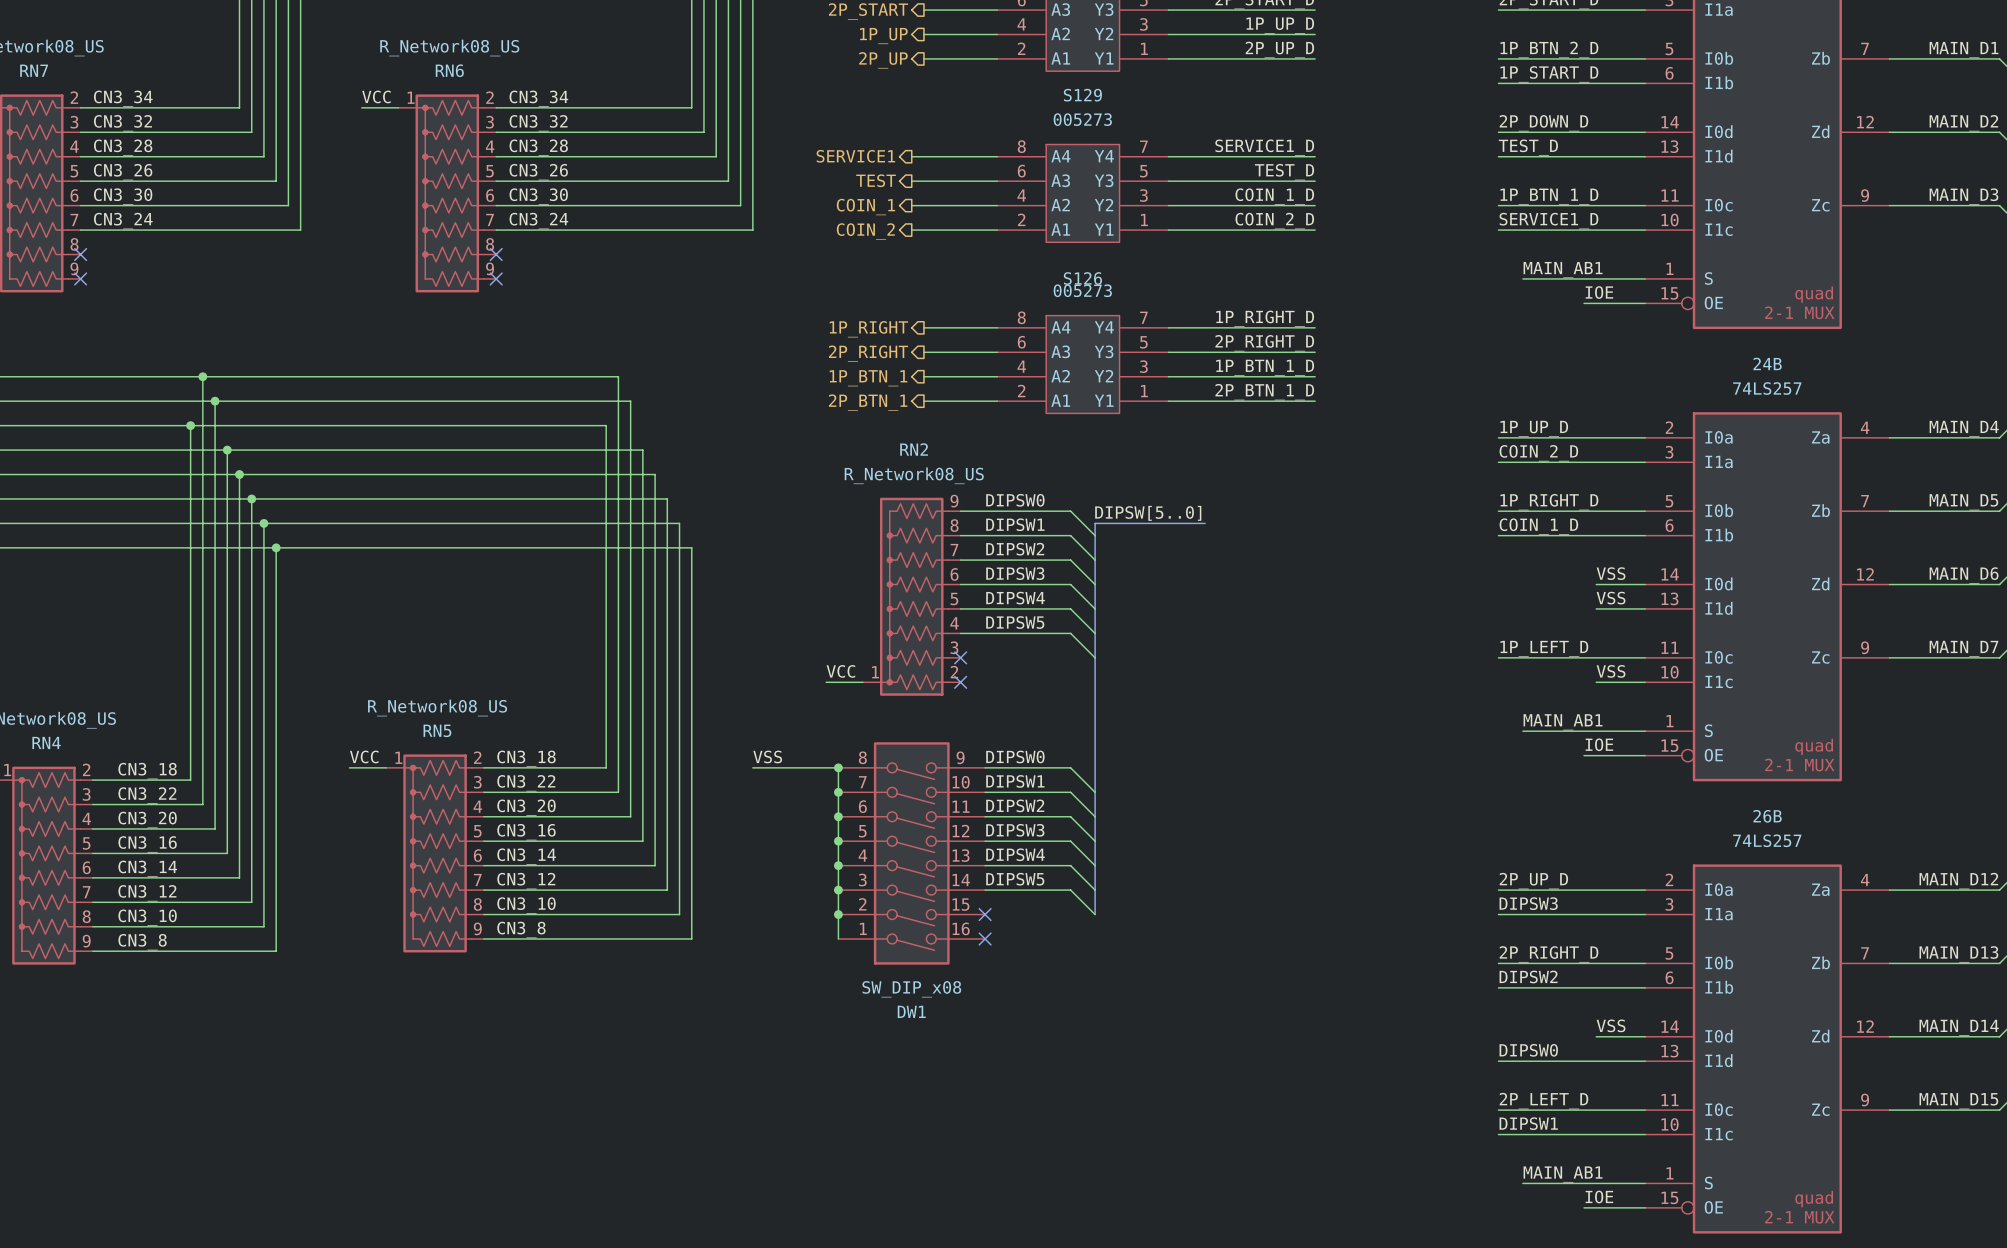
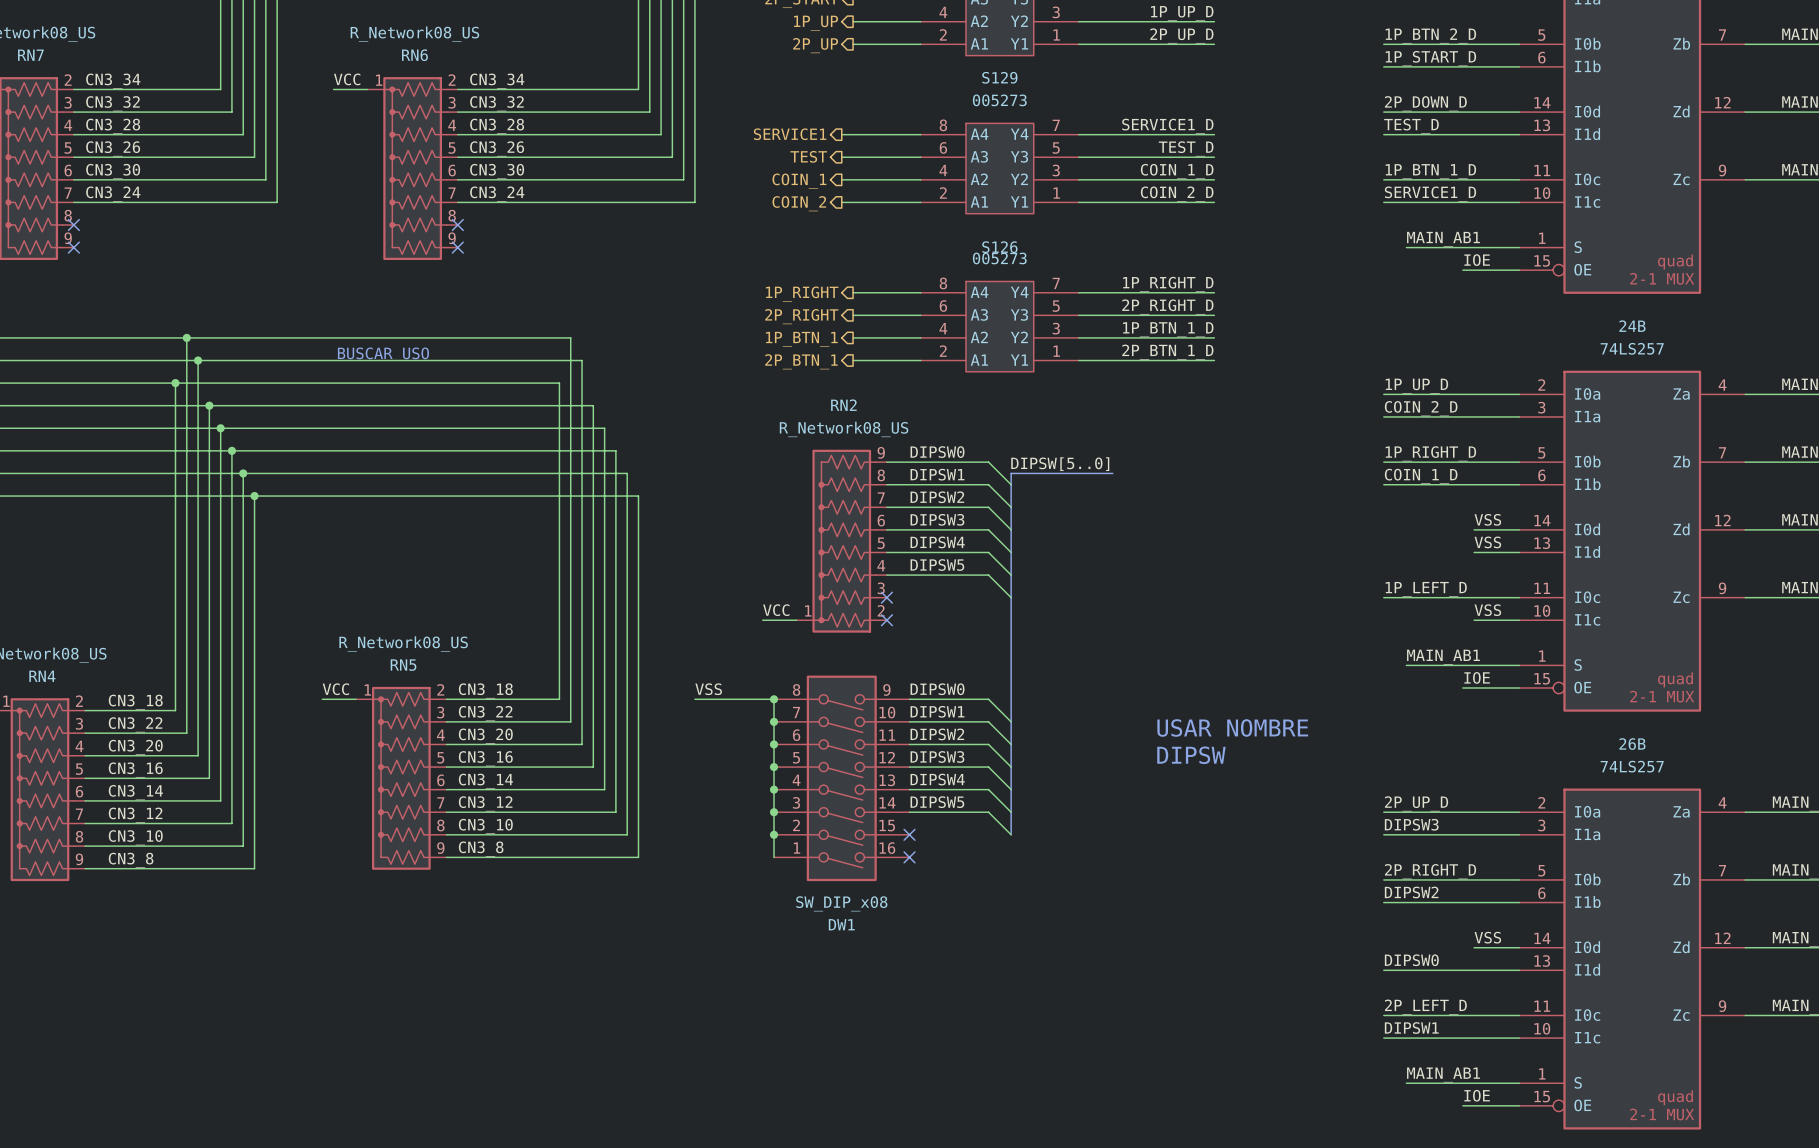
text: none -> BUSCAR USO (383, 353)
text: none -> USAR NOMBRE (1232, 727)
text: none -> DIPSW (1191, 755)

